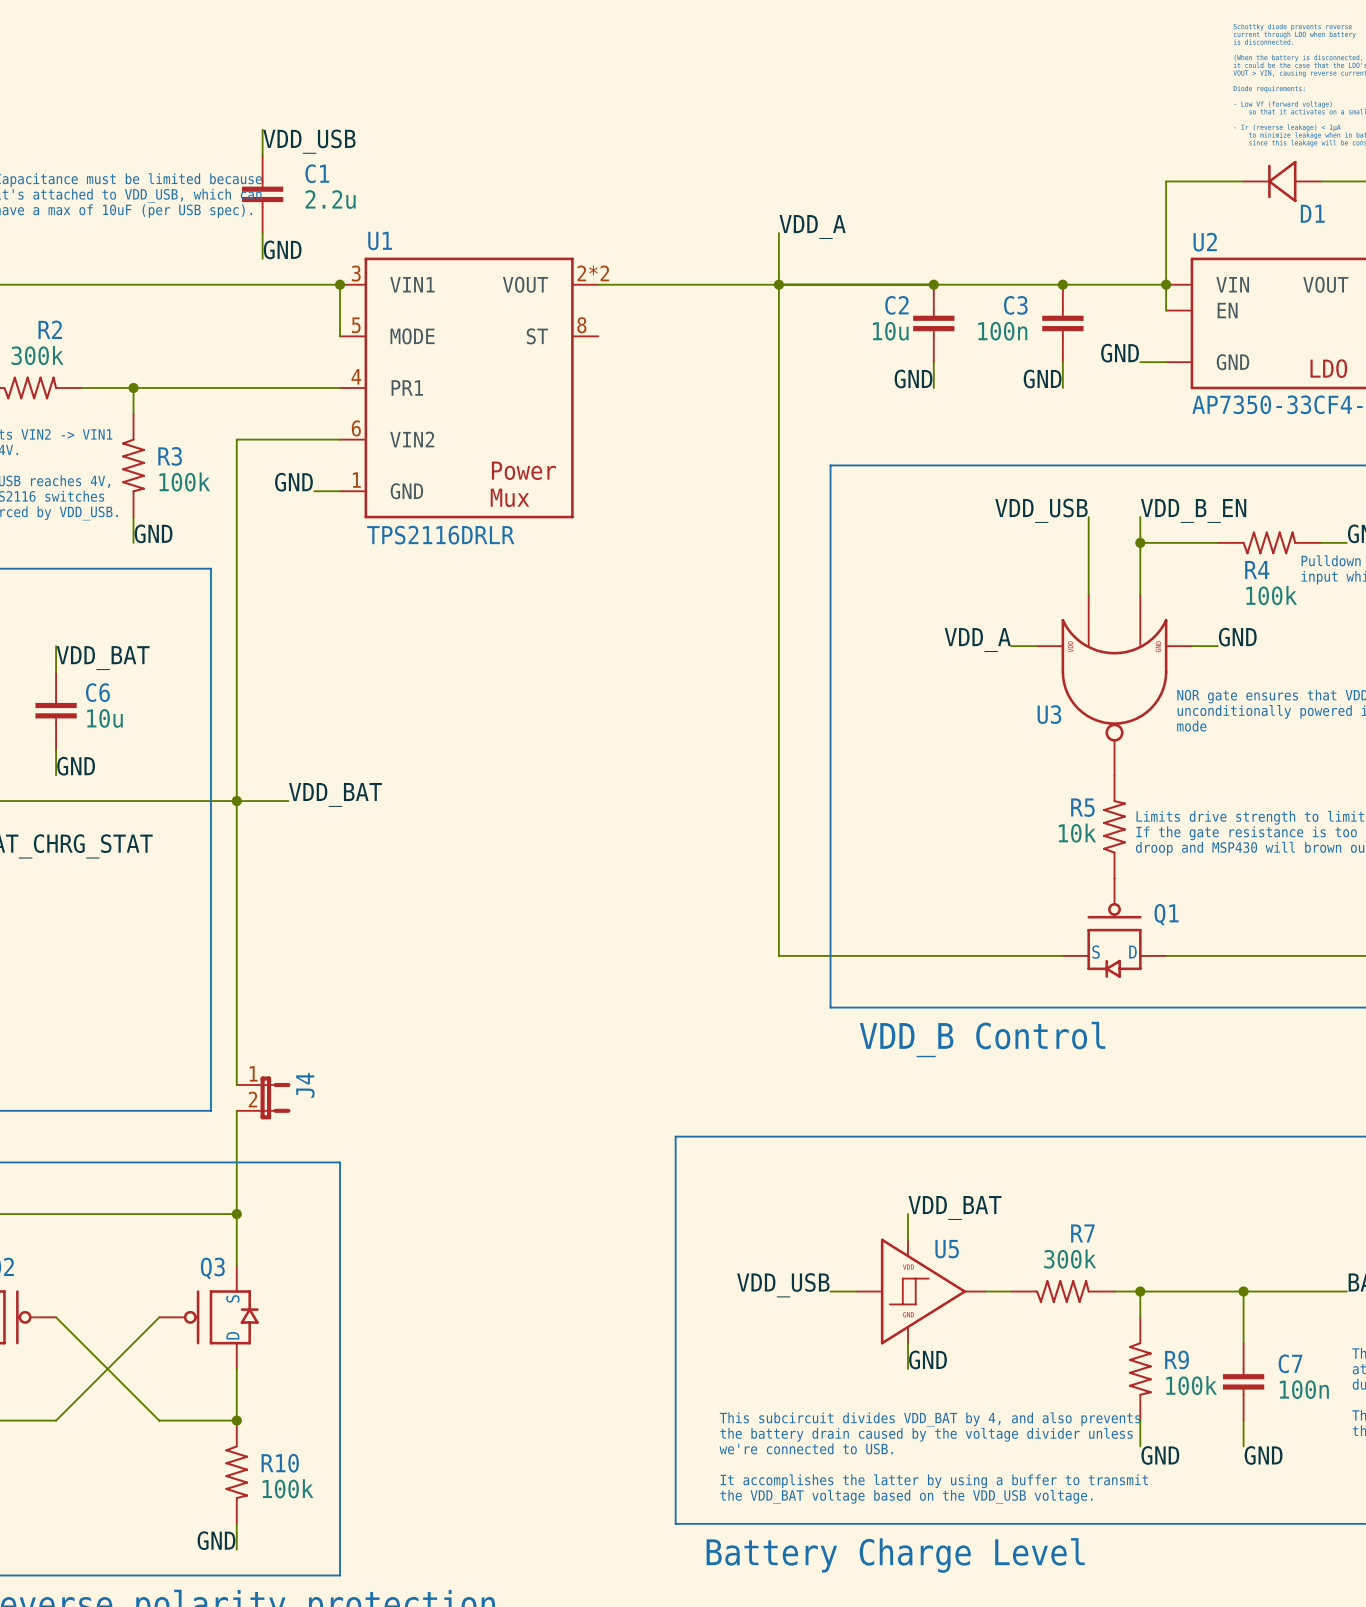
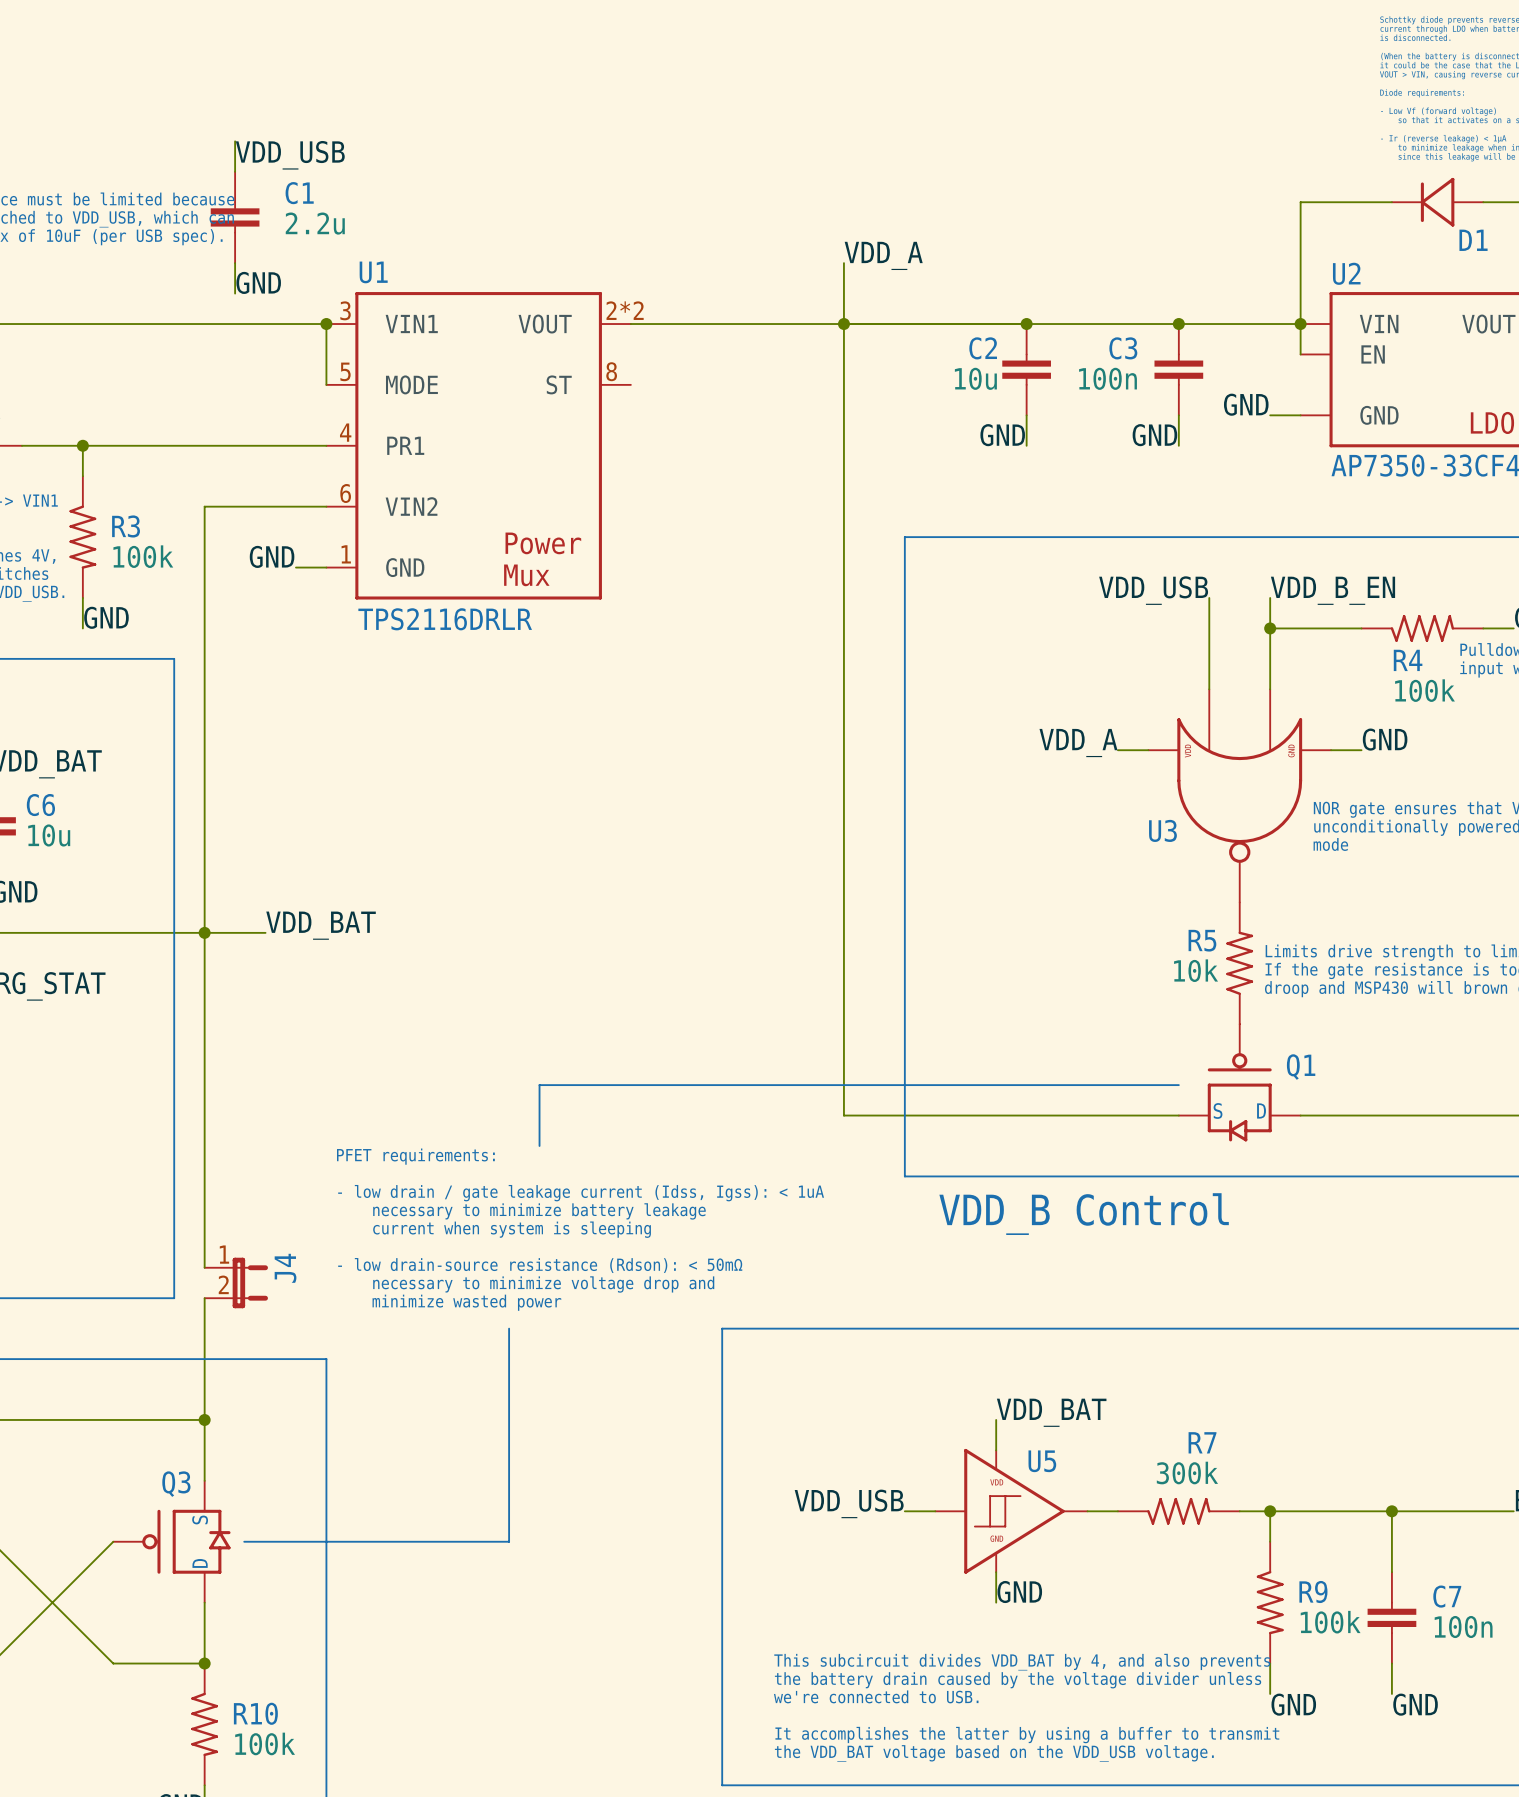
line: none -> (1178, 1085) (539, 1085) (539, 1145)
text: none -> PFET requirements: (415, 1156)
text: none -> - low drain / gate leakage current (Idss, Igss): < 1uA (581, 1193)
text: none -> necessary to minimize battery leakage (539, 1211)
text: none -> current when system is sleeping (512, 1229)
text: none -> - low drain-source resistance (Rdson): < 50mΩ (540, 1265)
text: none -> necessary to minimize voltage drop and (543, 1284)
text: none -> minimize wasted power (466, 1302)
line: none -> (509, 1328) (509, 1541) (244, 1541)

